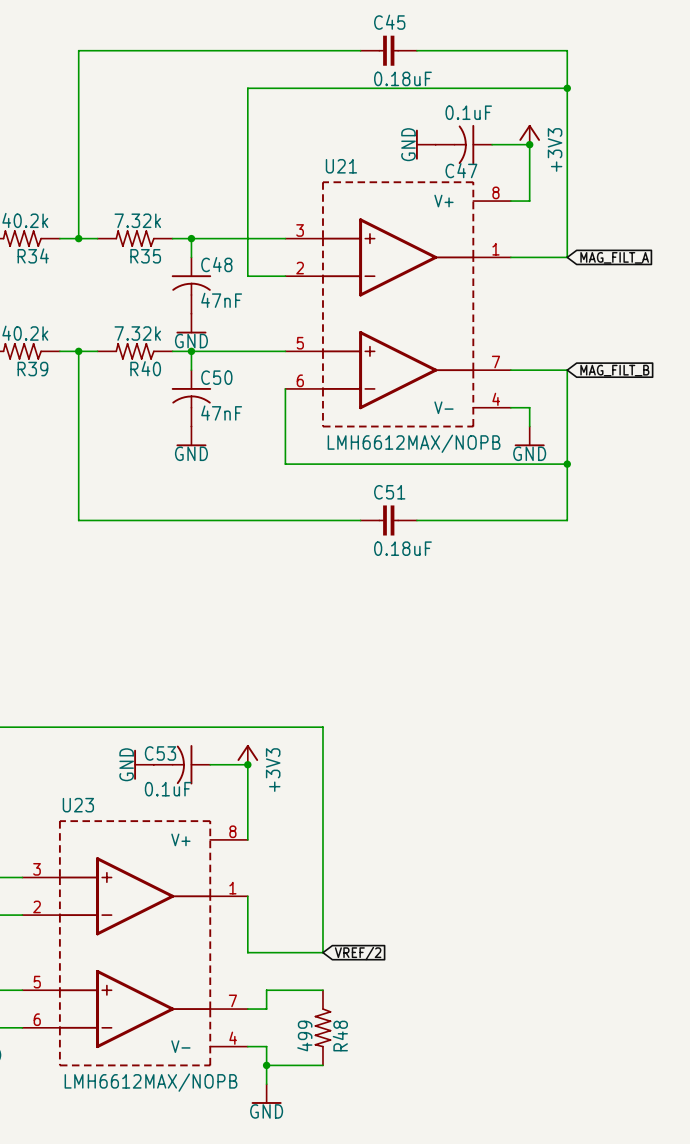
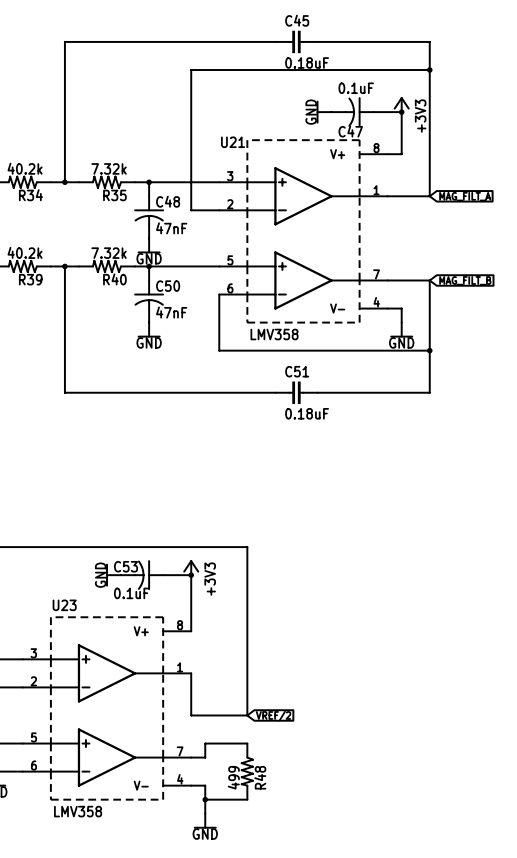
U21 name position: U21 (341, 166) -> U21 (233, 142)
U21 value: LMH6612MAX/NOPB (414, 443) -> LMV358 (274, 334)
U23 value: LMH6612MAX/NOPB (150, 1082) -> LMV358 (78, 811)

